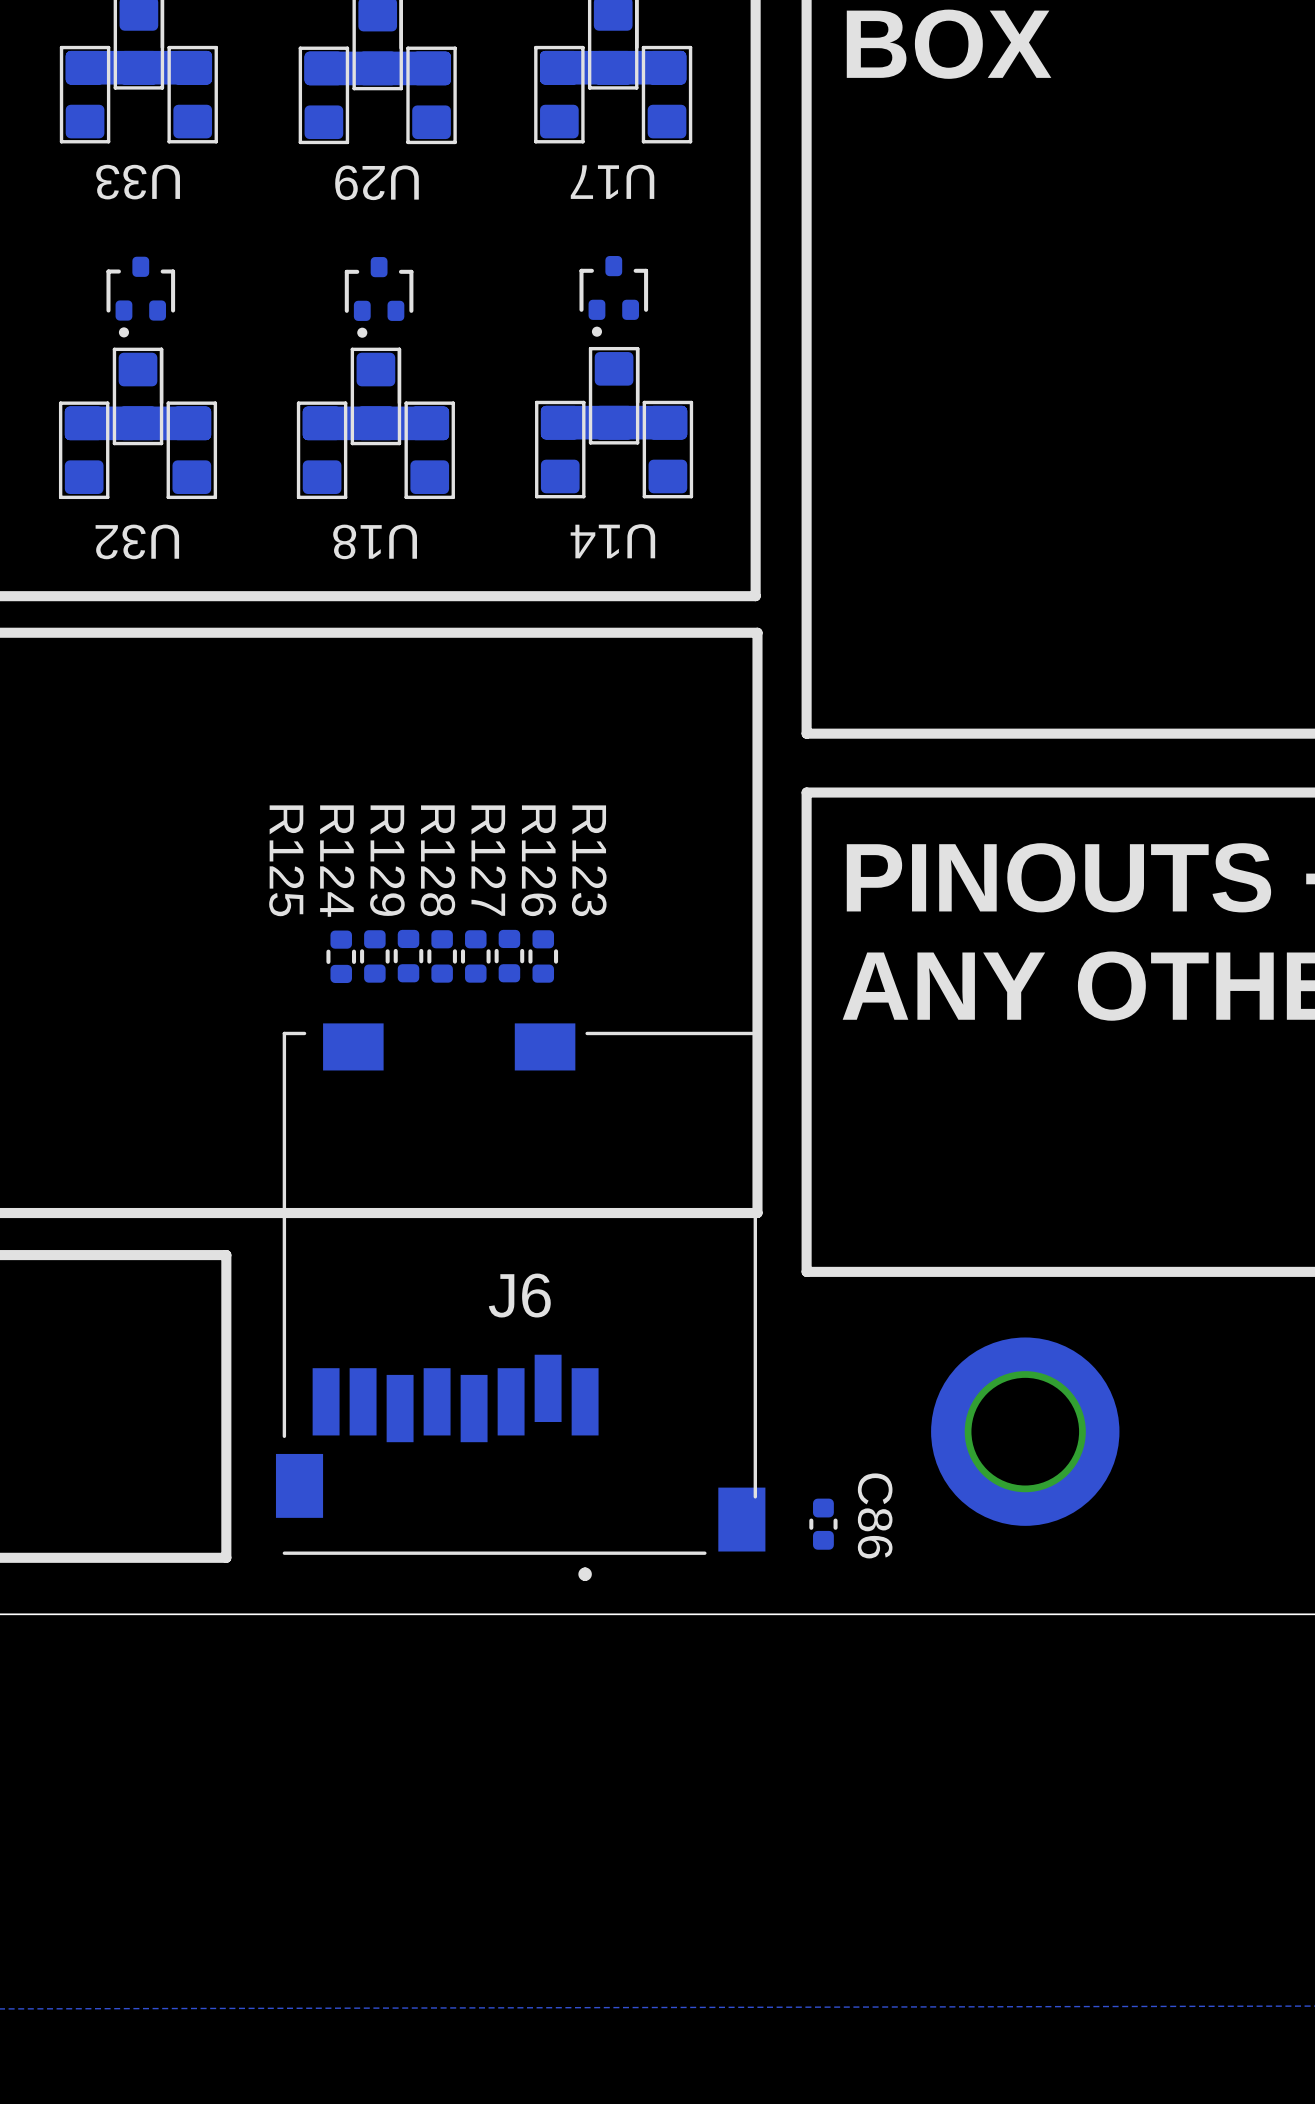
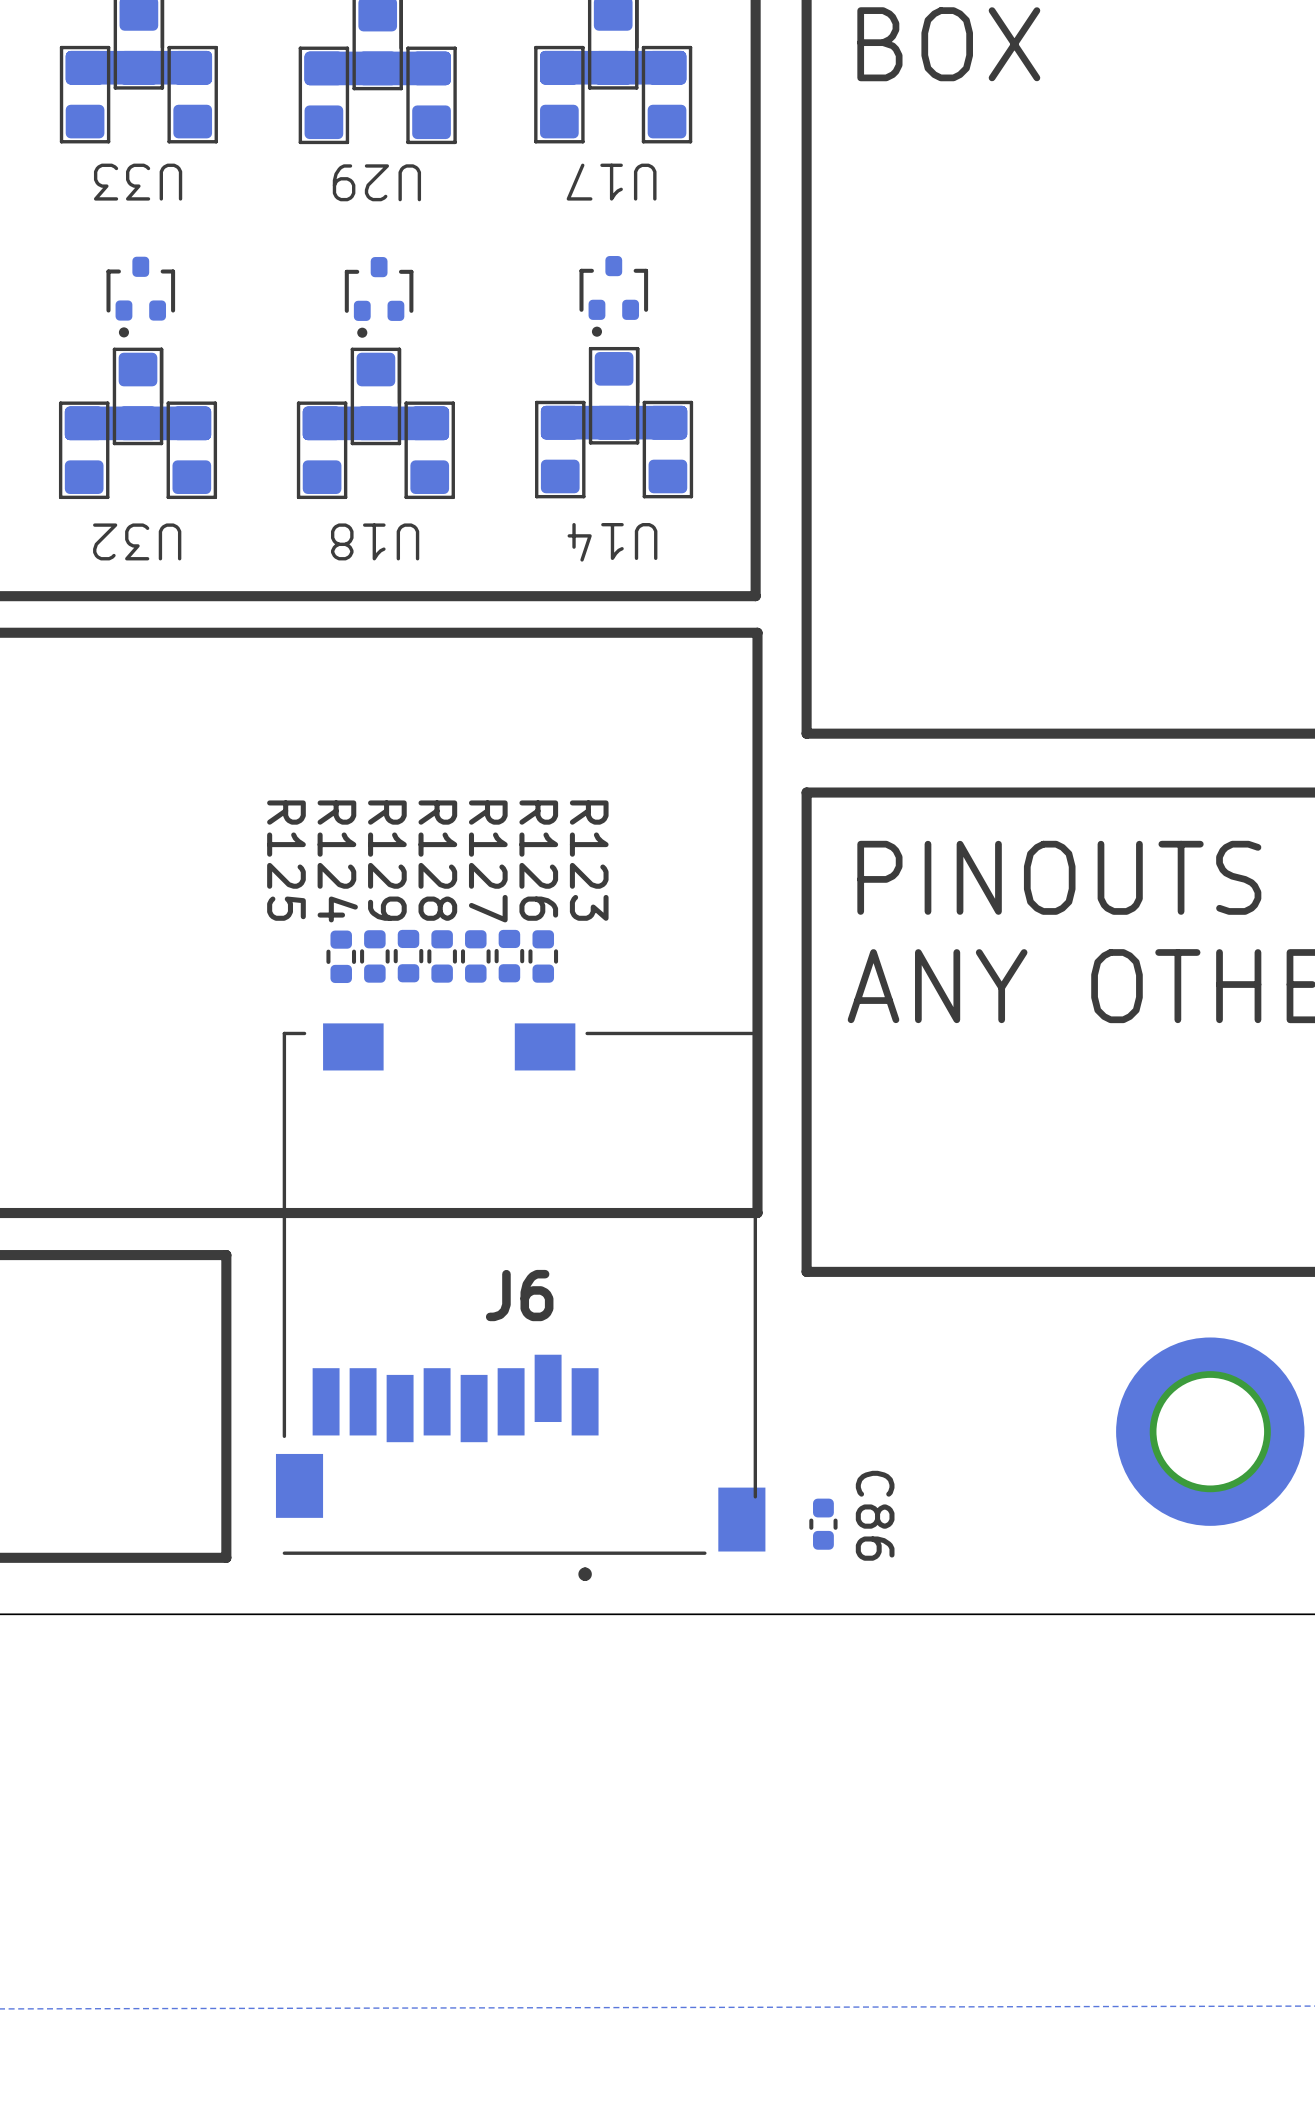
part position: (1025, 1431) -> (1210, 1431)

